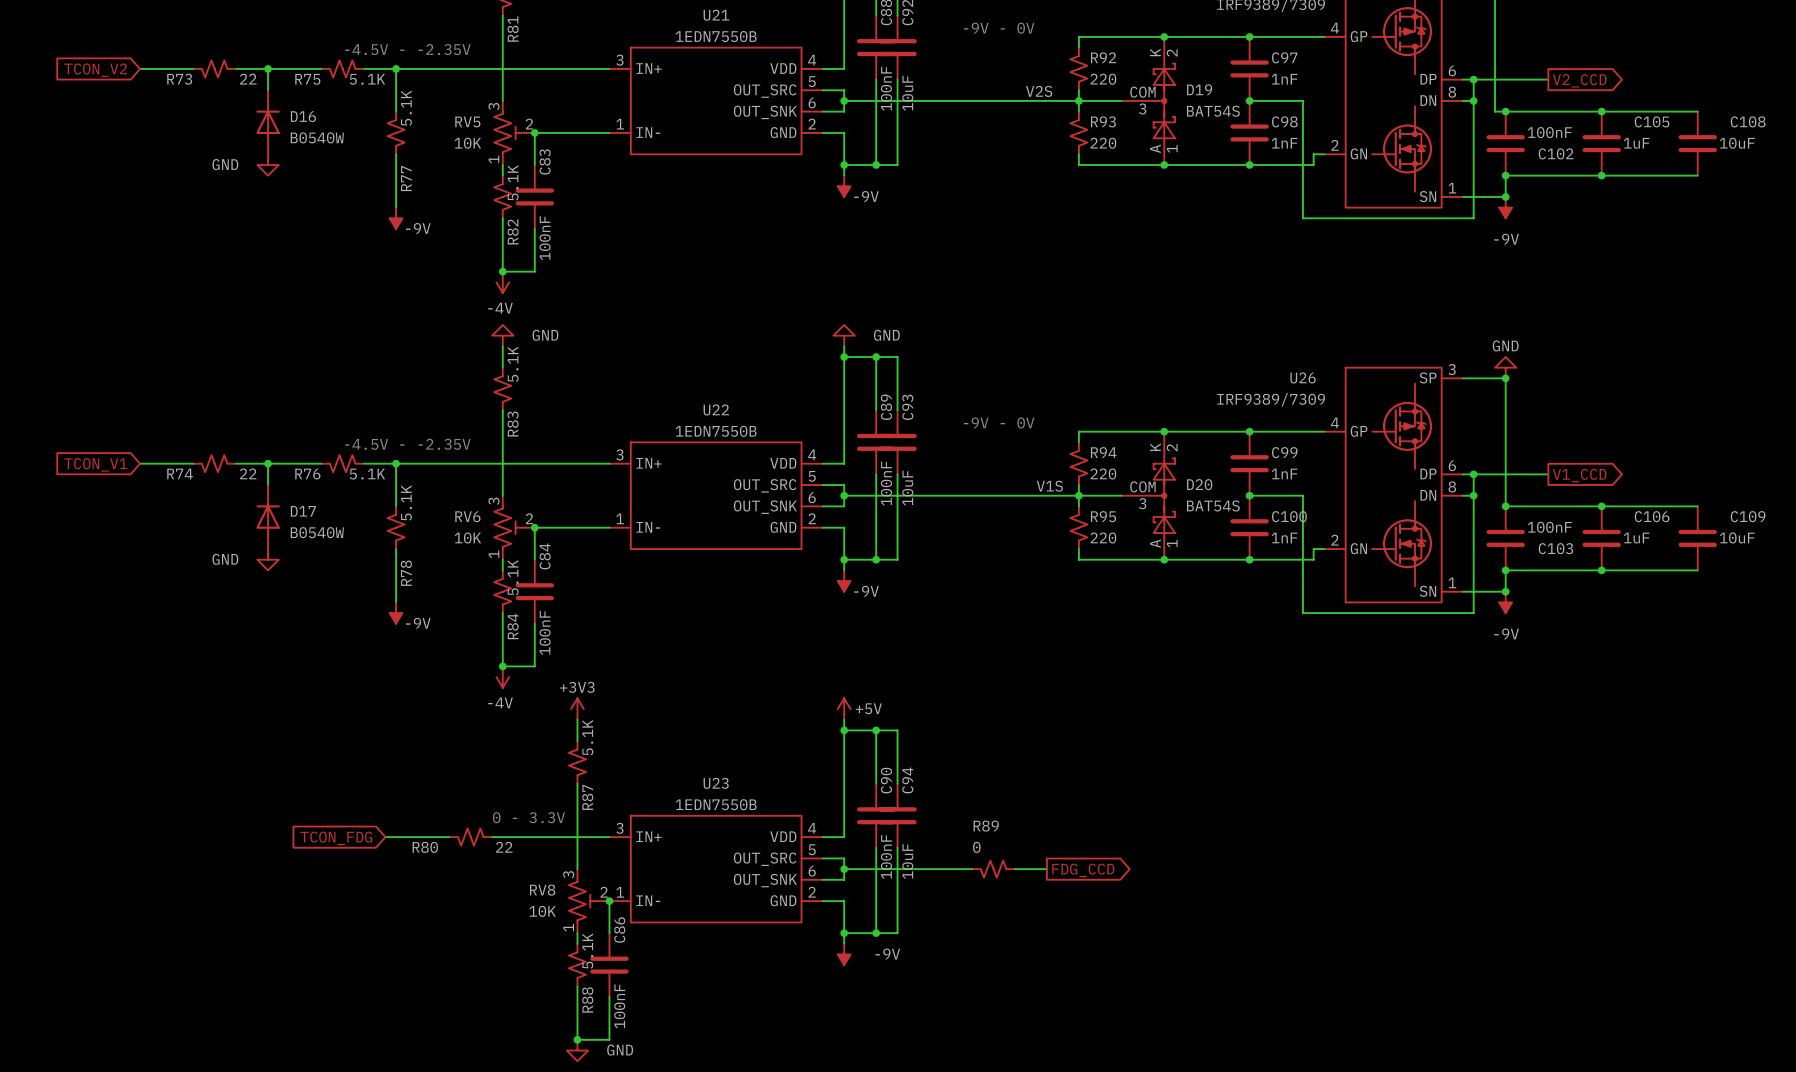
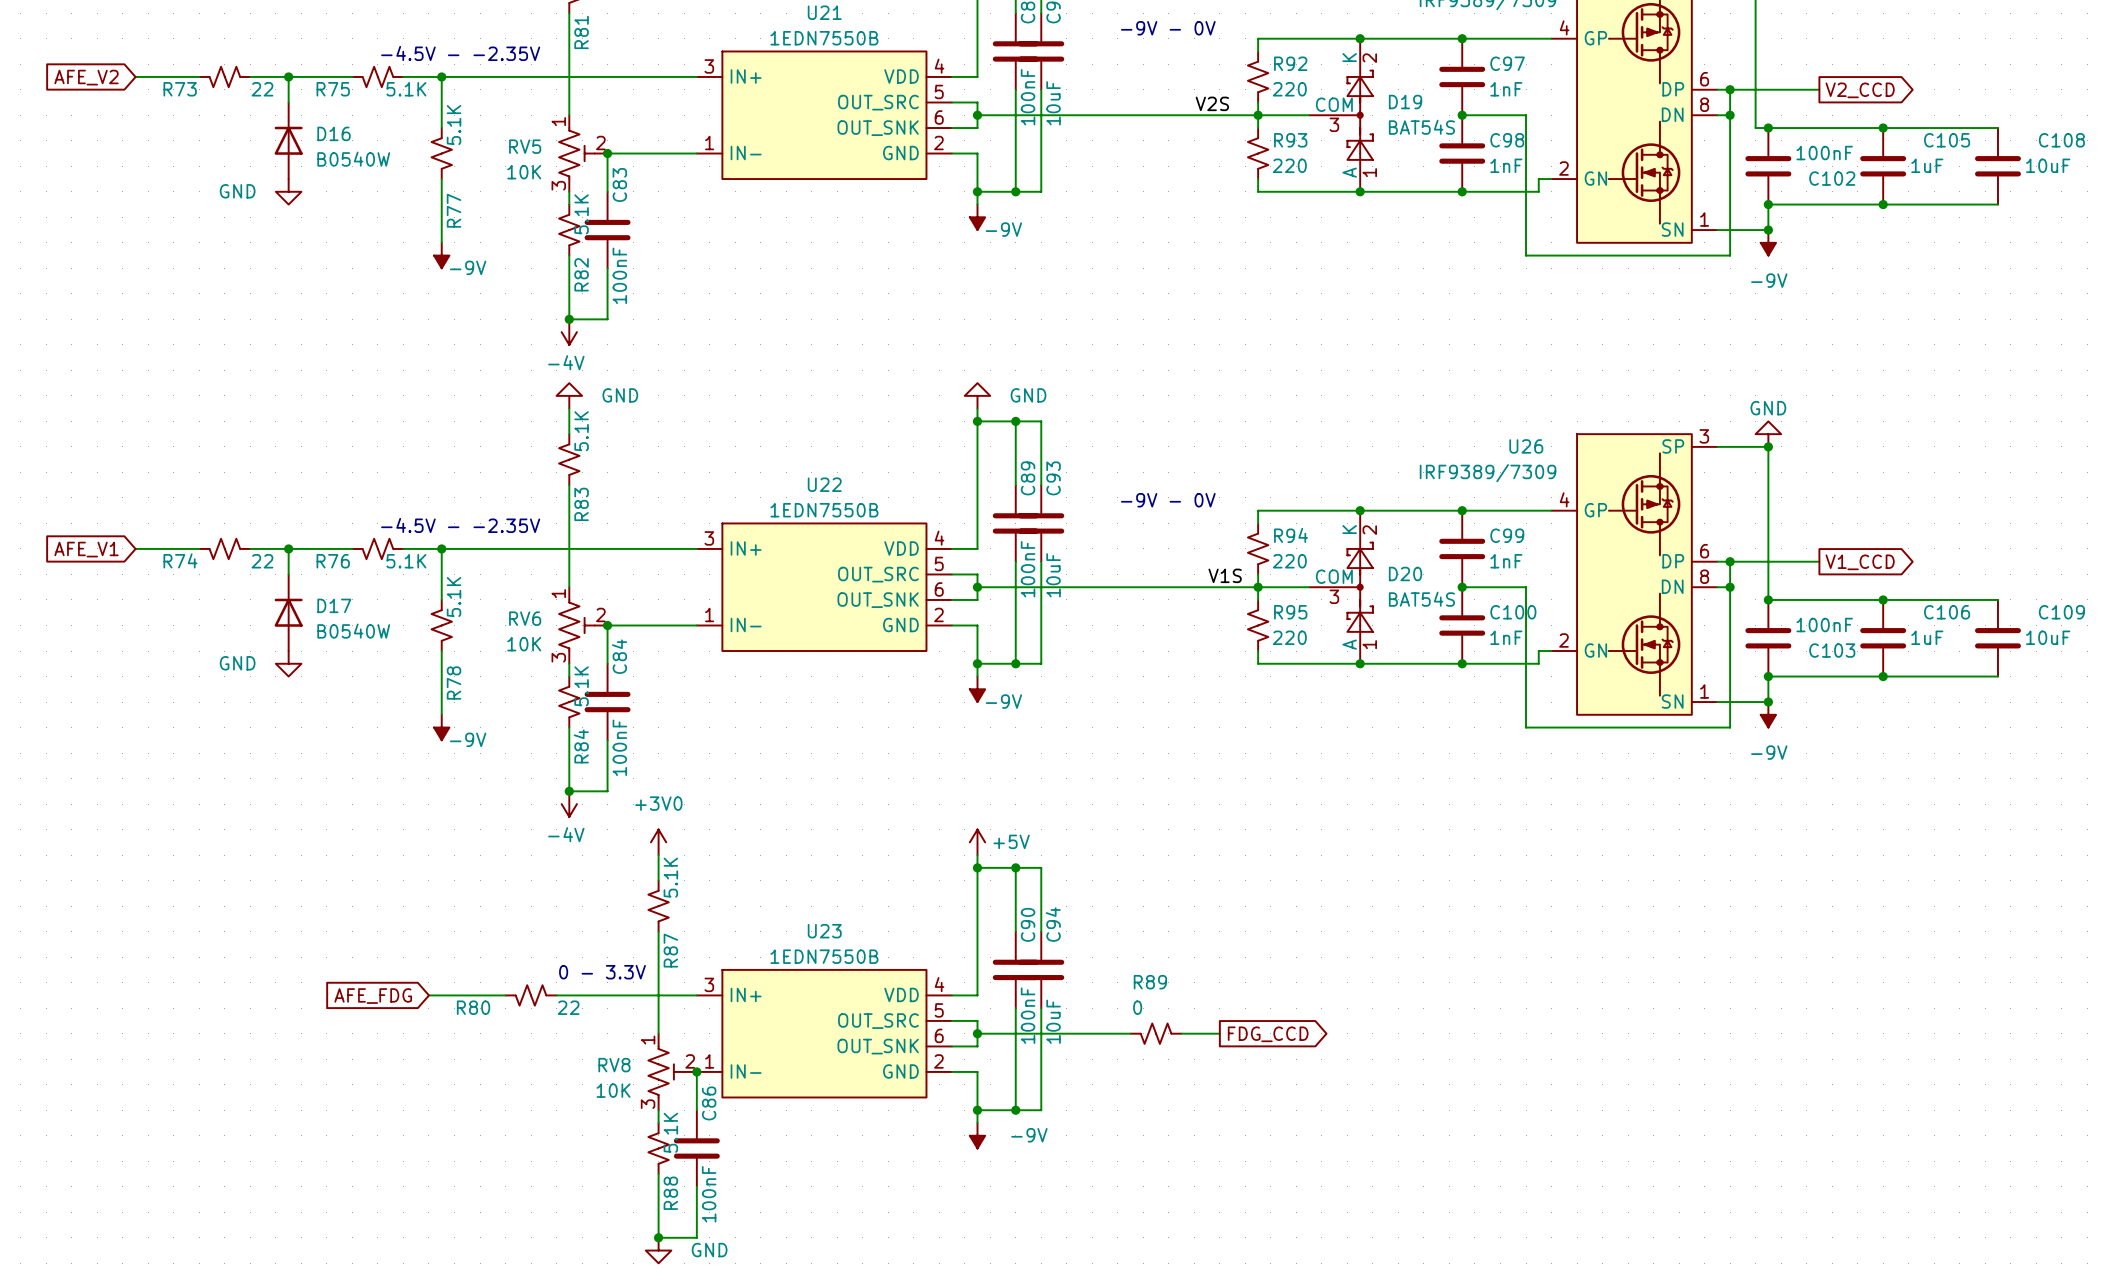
global label: TCON_V2 (95, 70) -> AFE_V2 (86, 77)
RV5 flip: as is (509, 132) -> up-down (576, 153)
global label: TCON_V1 (95, 464) -> AFE_V1 (86, 549)
RV6 flip: as is (509, 527) -> up-down (576, 625)
power symbol: +3V3 (577, 709) -> +3V0 (658, 842)
global label: TCON_FDG (336, 838) -> AFE_FDG (373, 996)
RV8 flip: as is (583, 901) -> up-down (666, 1071)

